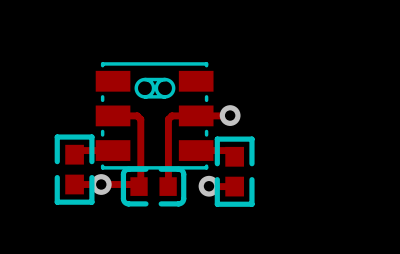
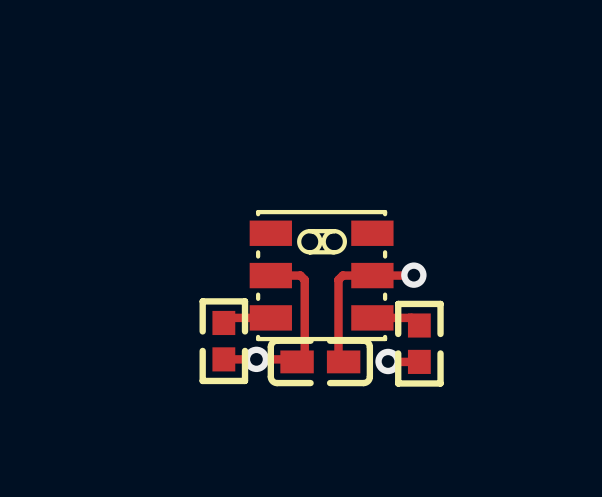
part footprint: [120, 166, 187, 207] -> [267, 337, 374, 387]

